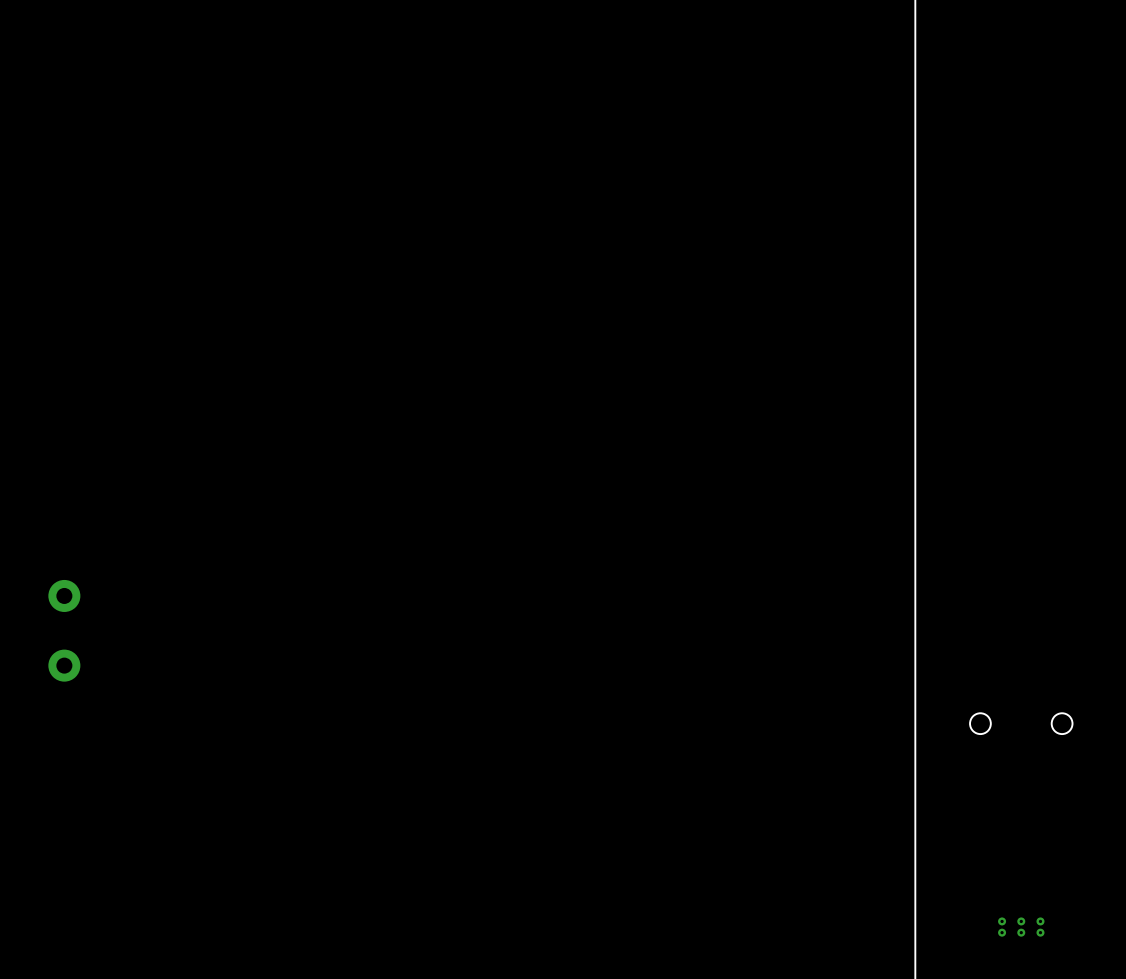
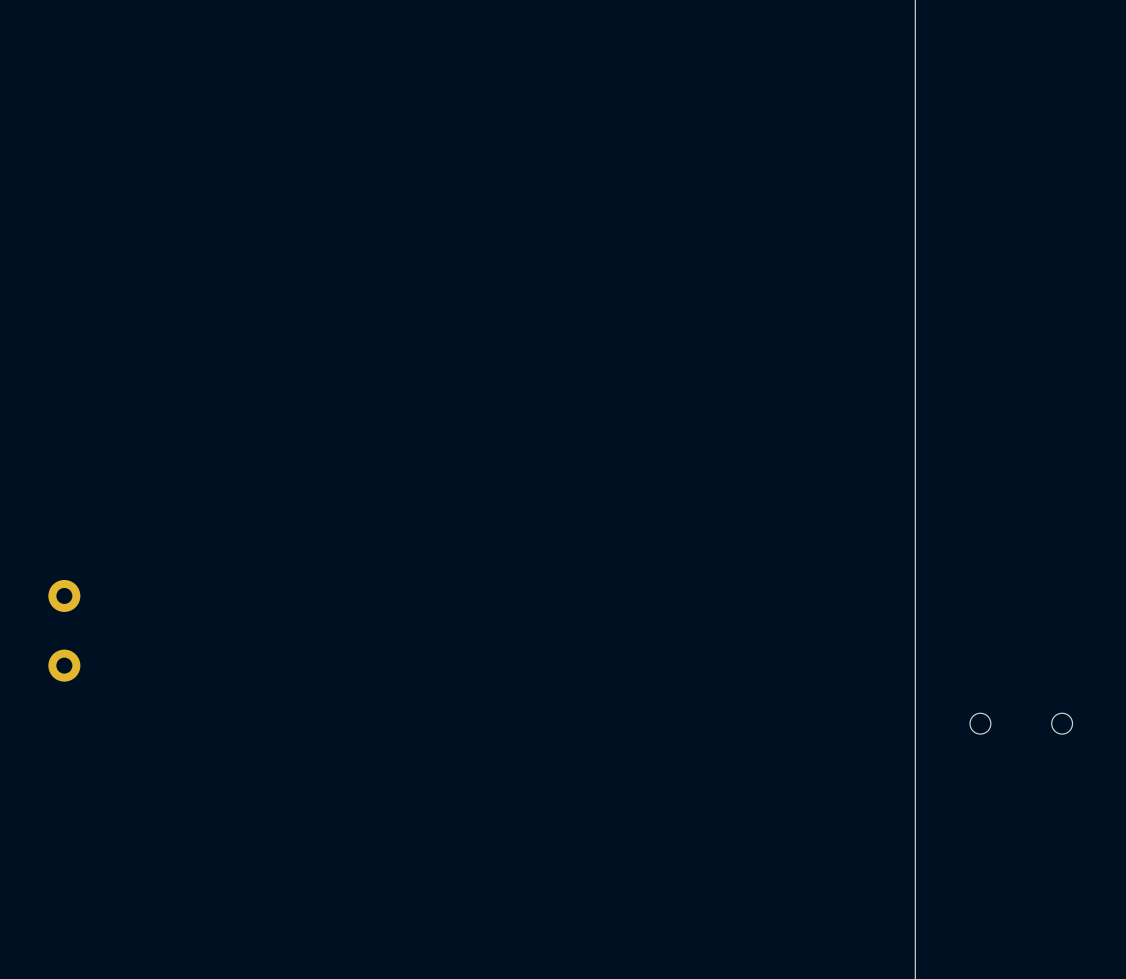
part: (1021, 927) -> none

